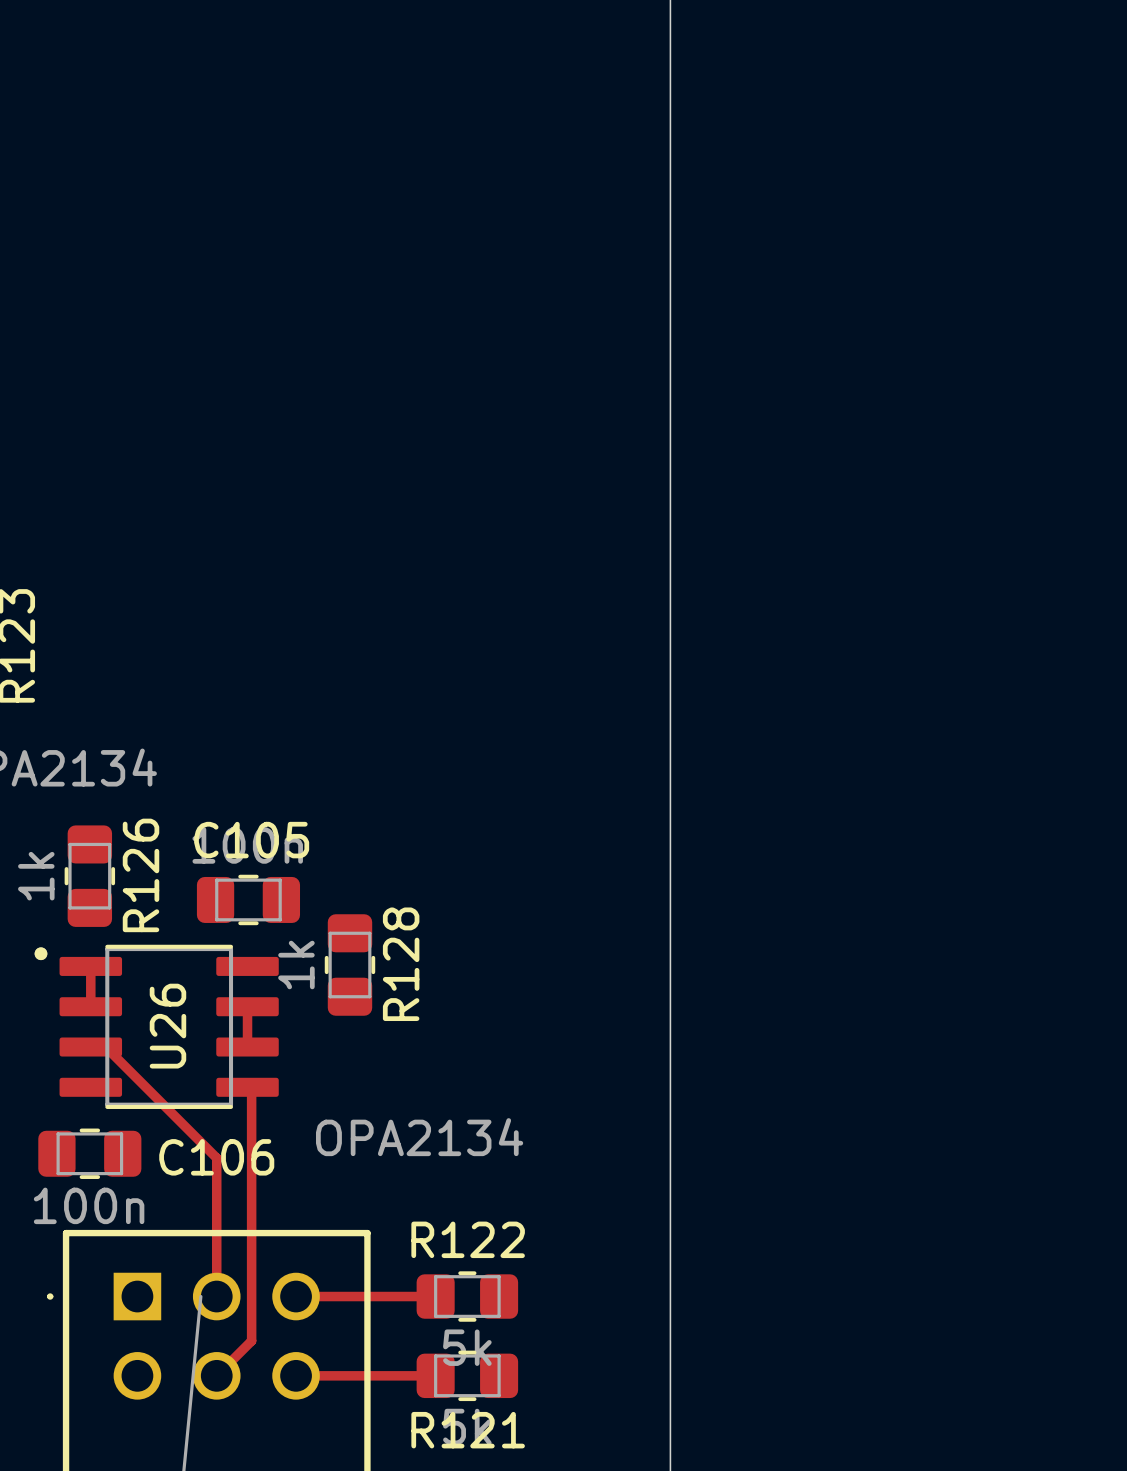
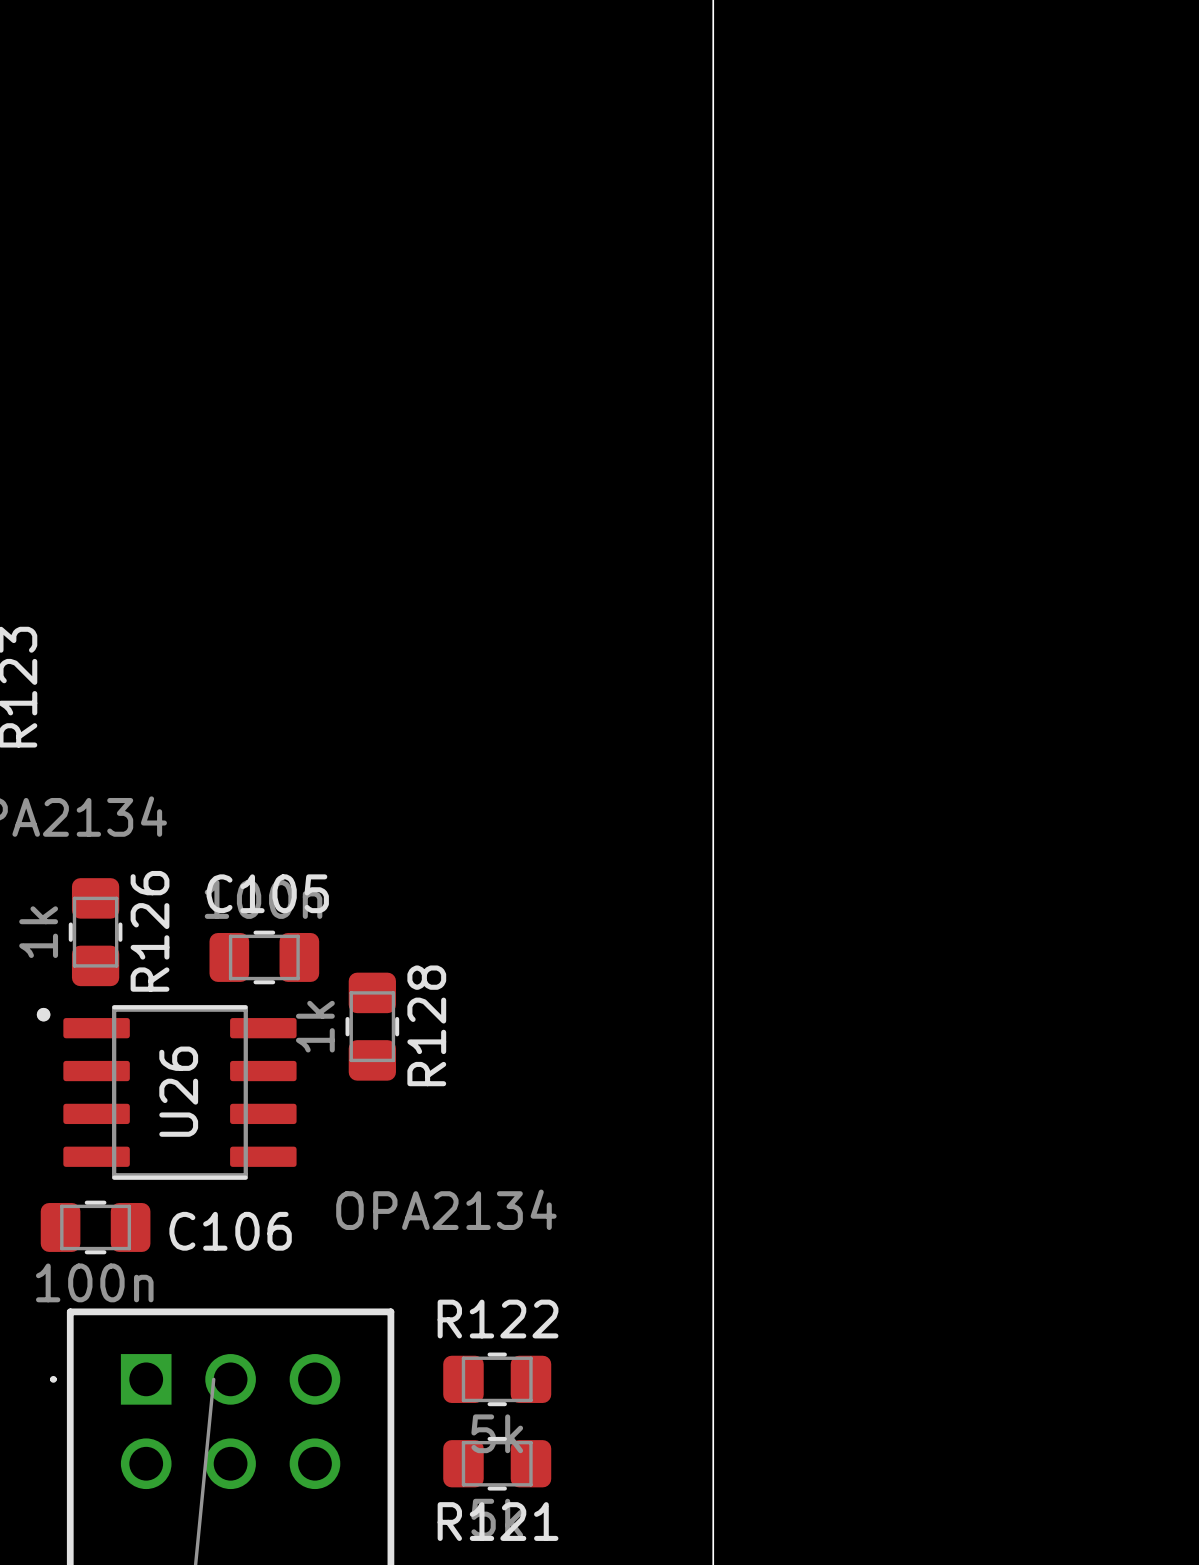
track: (90, 966) (90, 1006) -> none
track: (247, 1006) (247, 1047) -> none
track: (90, 1047) (105, 1047) (216, 1158) (216, 1296) -> none
track: (247, 1087) (251, 1091) (251, 1340) (216, 1375) -> none
track: (296, 1296) (435, 1296) -> none
track: (296, 1375) (435, 1375) -> none

